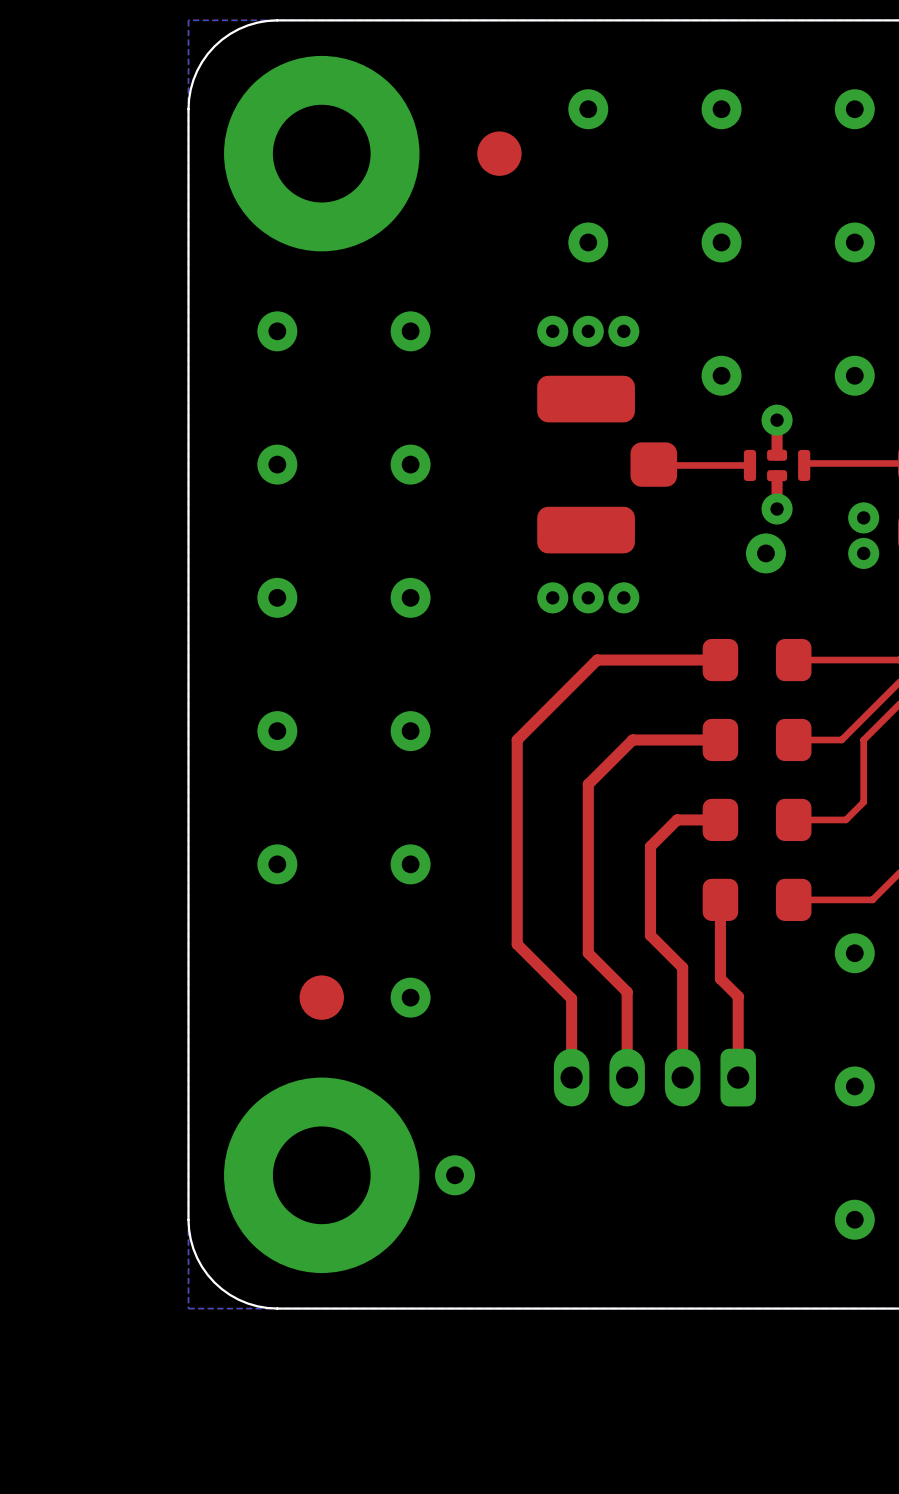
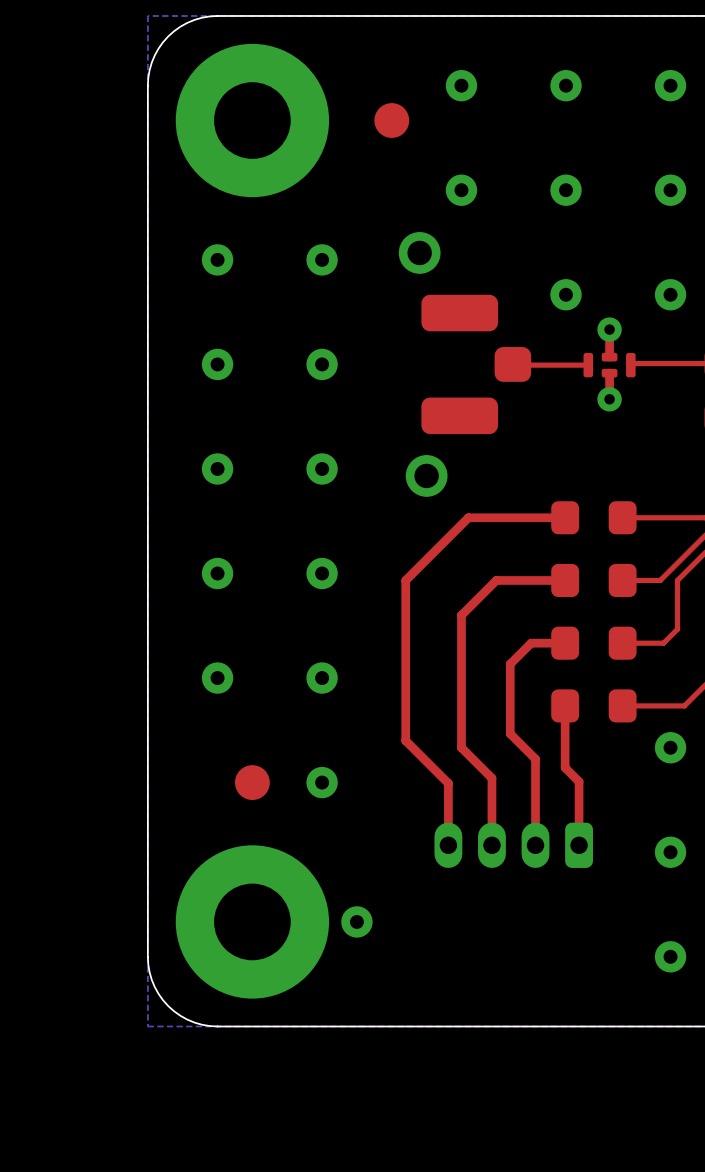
via size: [537, 315, 569, 347] -> [398, 232, 441, 274]
via: (588, 331) -> none
via: (623, 331) -> none
via: (863, 517) -> none
via: (765, 553) -> none
via: (863, 553) -> none
via size: [537, 582, 569, 614] -> [405, 455, 448, 497]
via: (588, 597) -> none
via: (623, 597) -> none

